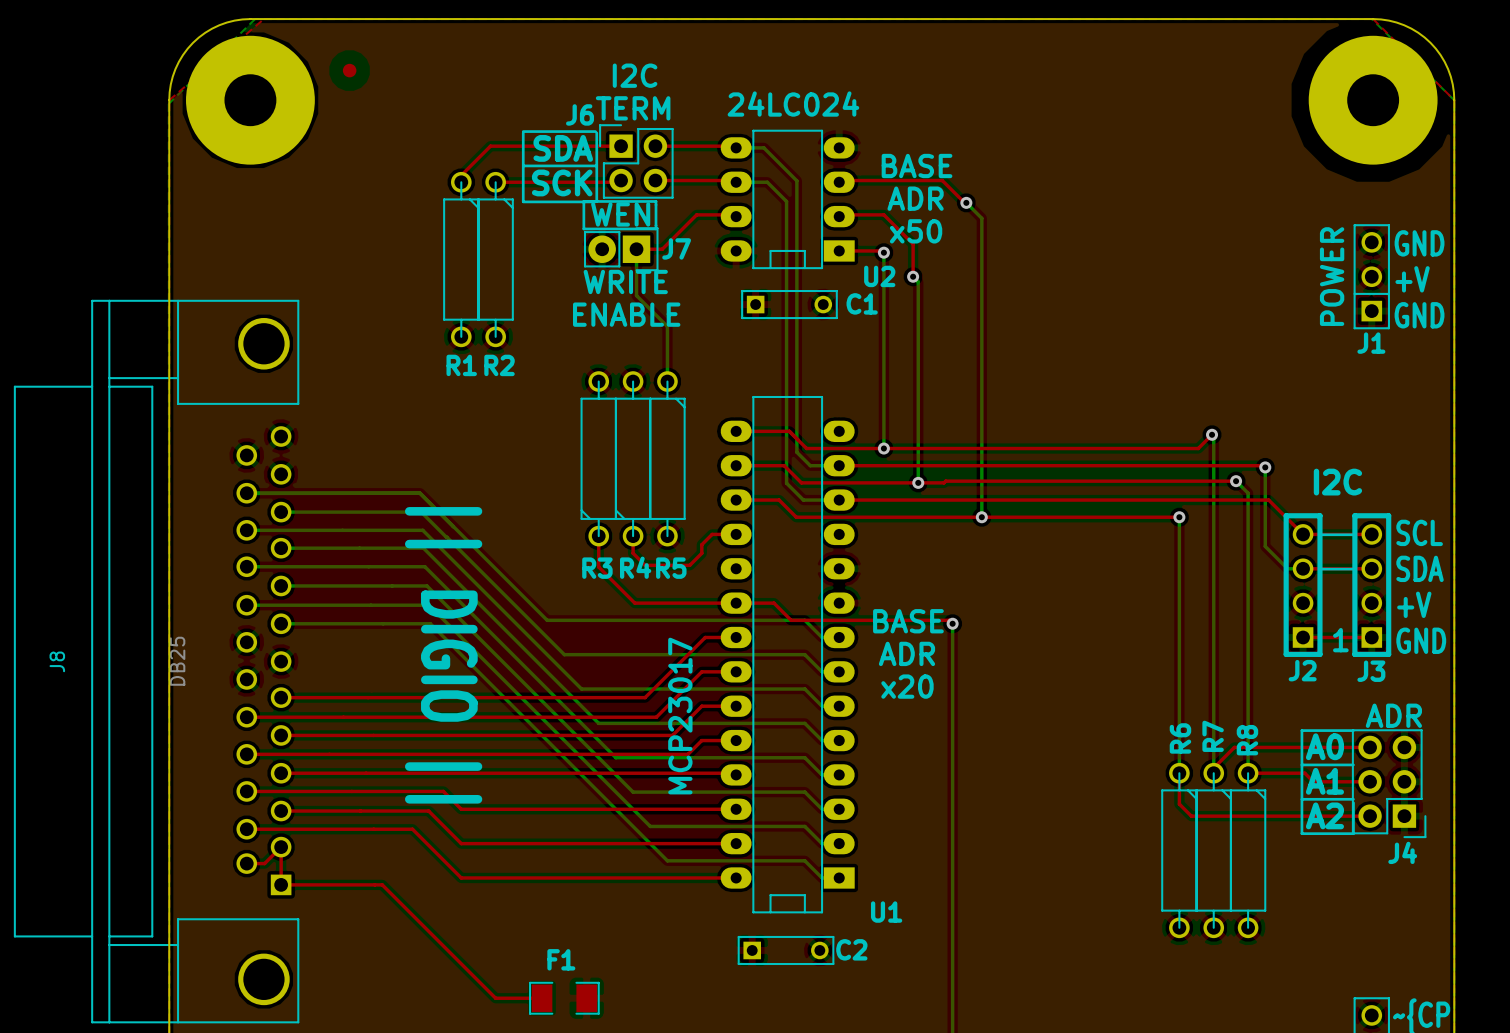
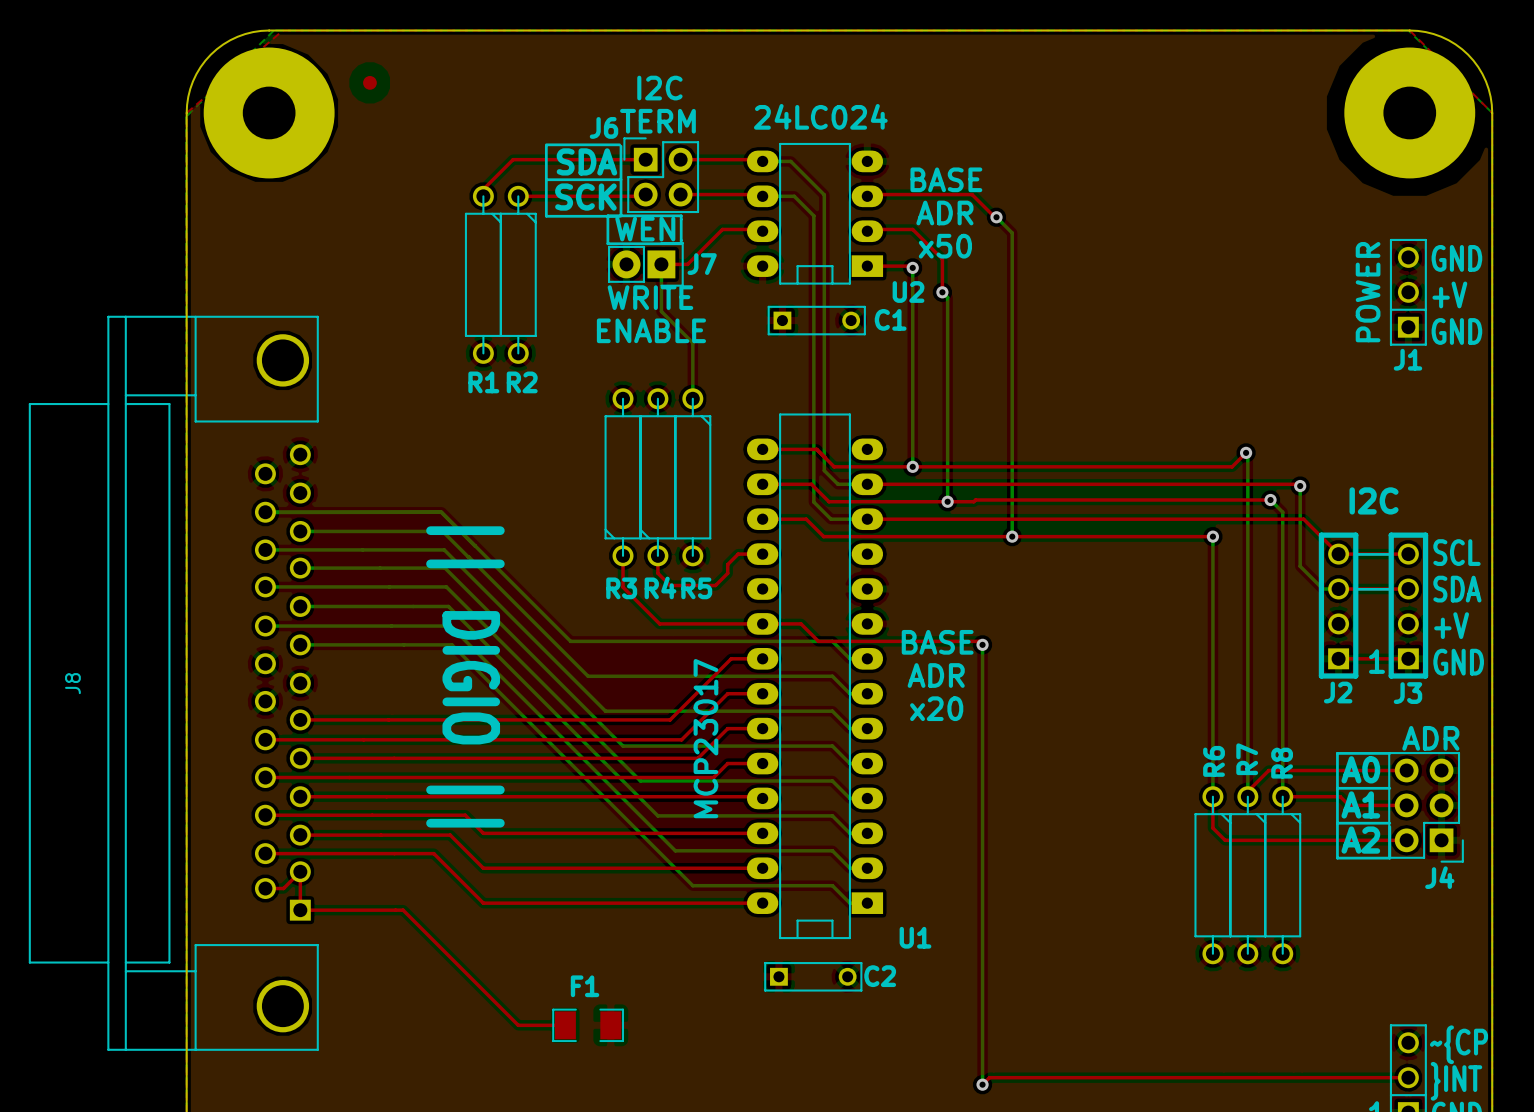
J8 value: DB25 (177, 661) -> none

